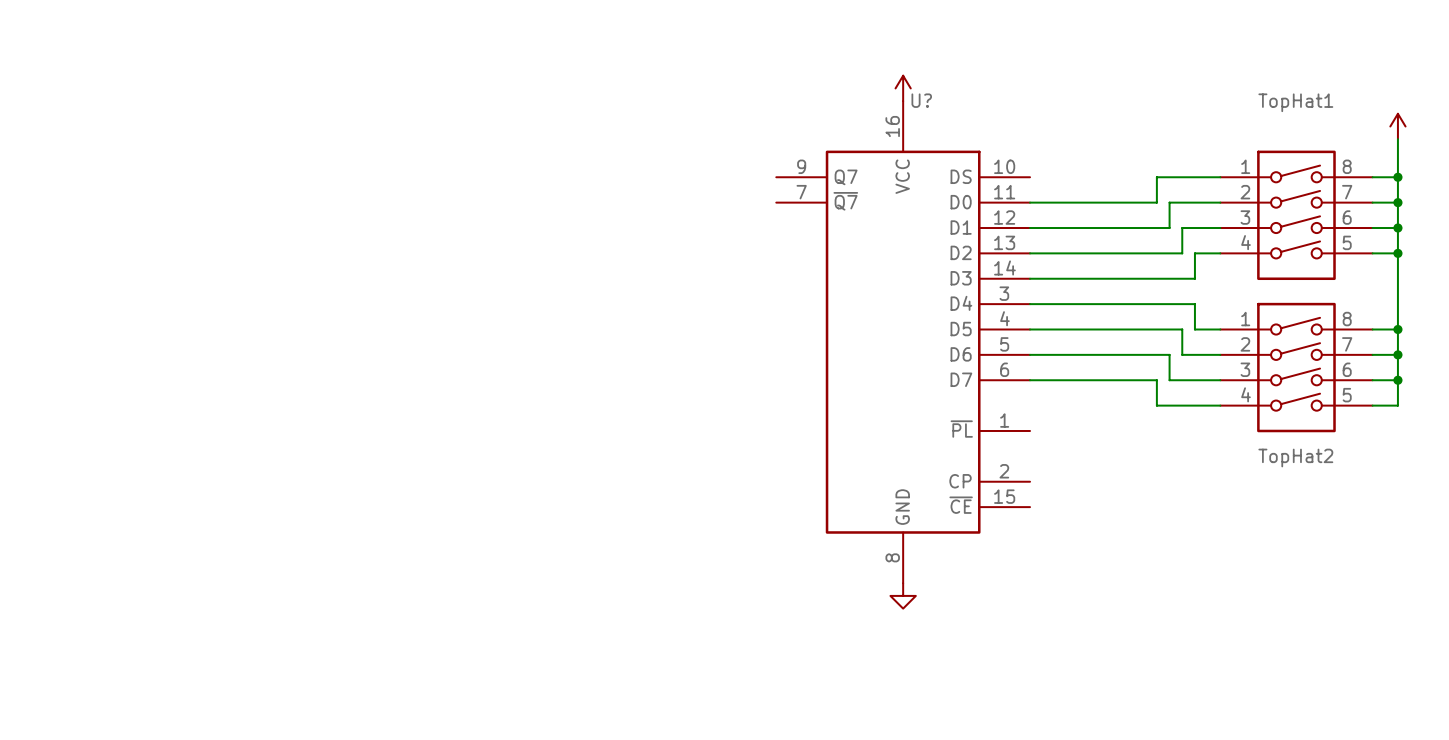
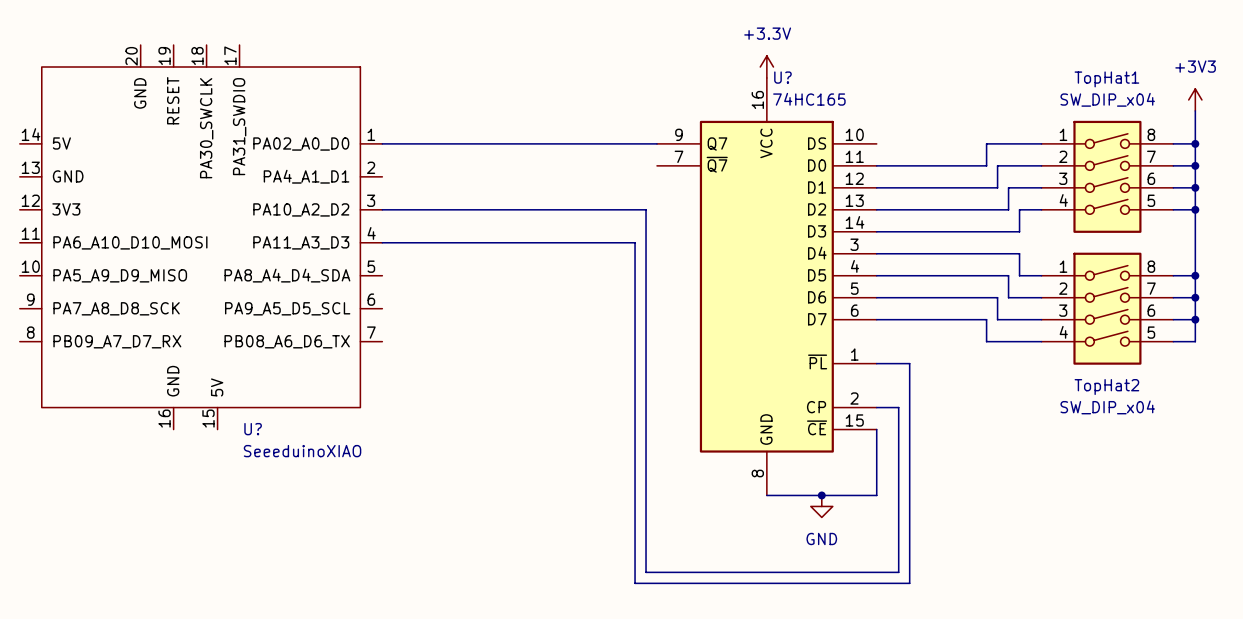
power symbol text: none -> +3.3V (767, 33)
power symbol text: none -> +3V3 (1195, 66)
U? value: none -> 74HC165 (809, 99)
TopHat1 value: none -> SW_DIP_x04 (1107, 99)
wire: none -> (382, 143) (657, 143)
wire: none -> (382, 209) (646, 209) (646, 572) (898, 572) (898, 407) (876, 407)
U?: none -> SeeeduinoXIAO (201, 237)
wire: none -> (382, 242) (635, 242) (635, 583) (909, 583) (909, 363) (876, 363)
TopHat2 value: none -> SW_DIP_x04 (1107, 407)
wire: none -> (876, 429) (876, 495) (766, 495)
junction: none -> (821, 495)
power symbol: (903, 595) -> none
power symbol: none -> GND (821, 506)

